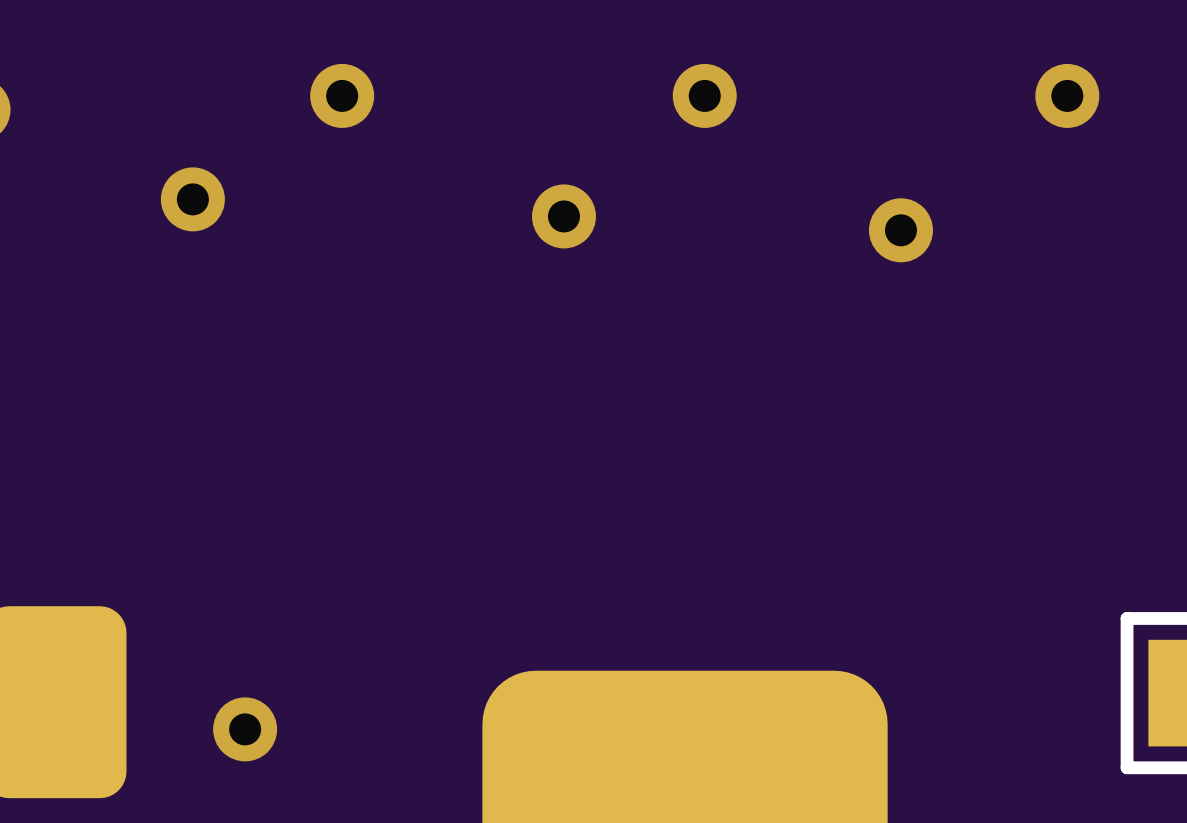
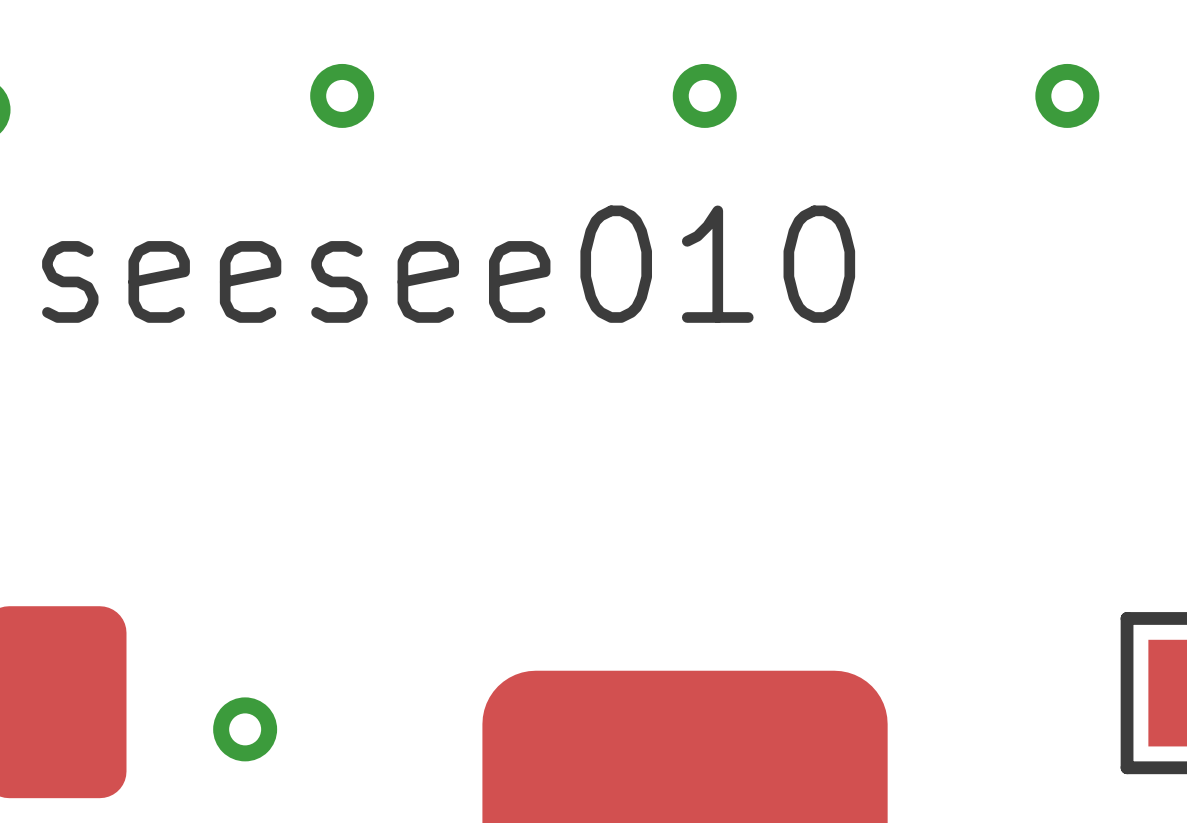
via: (192, 199) -> none
via: (563, 216) -> none
via: (900, 230) -> none
text: none -> seesee010 (448, 264)

